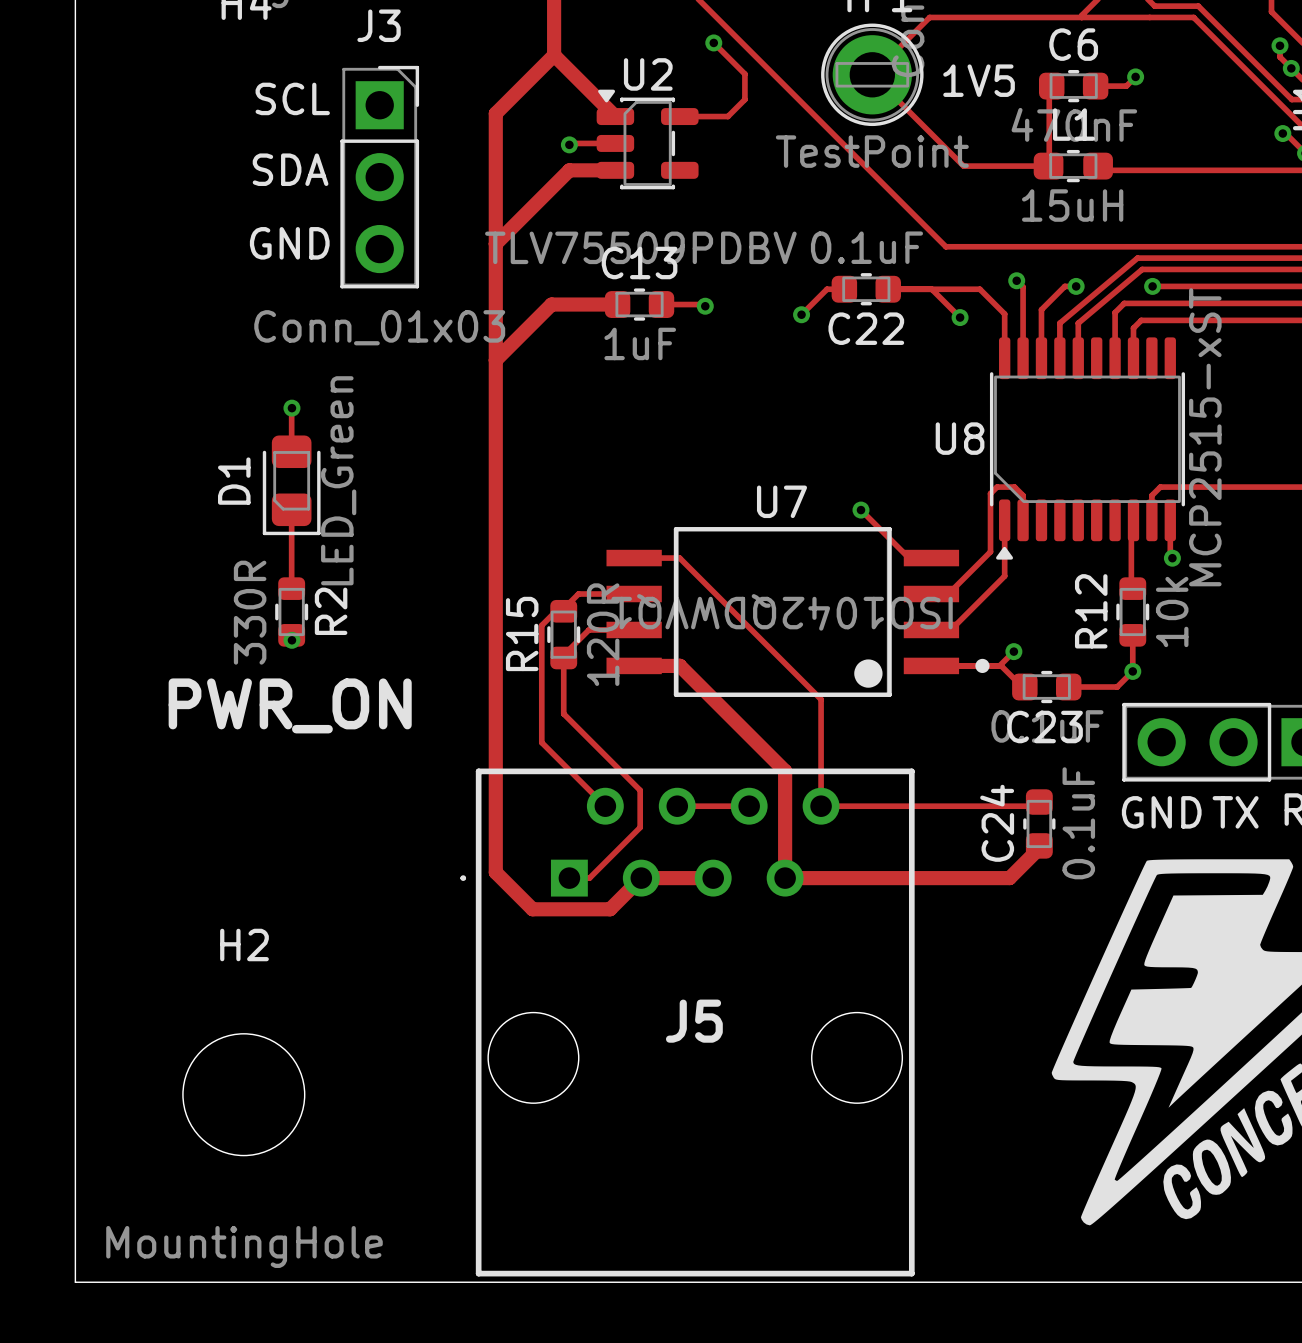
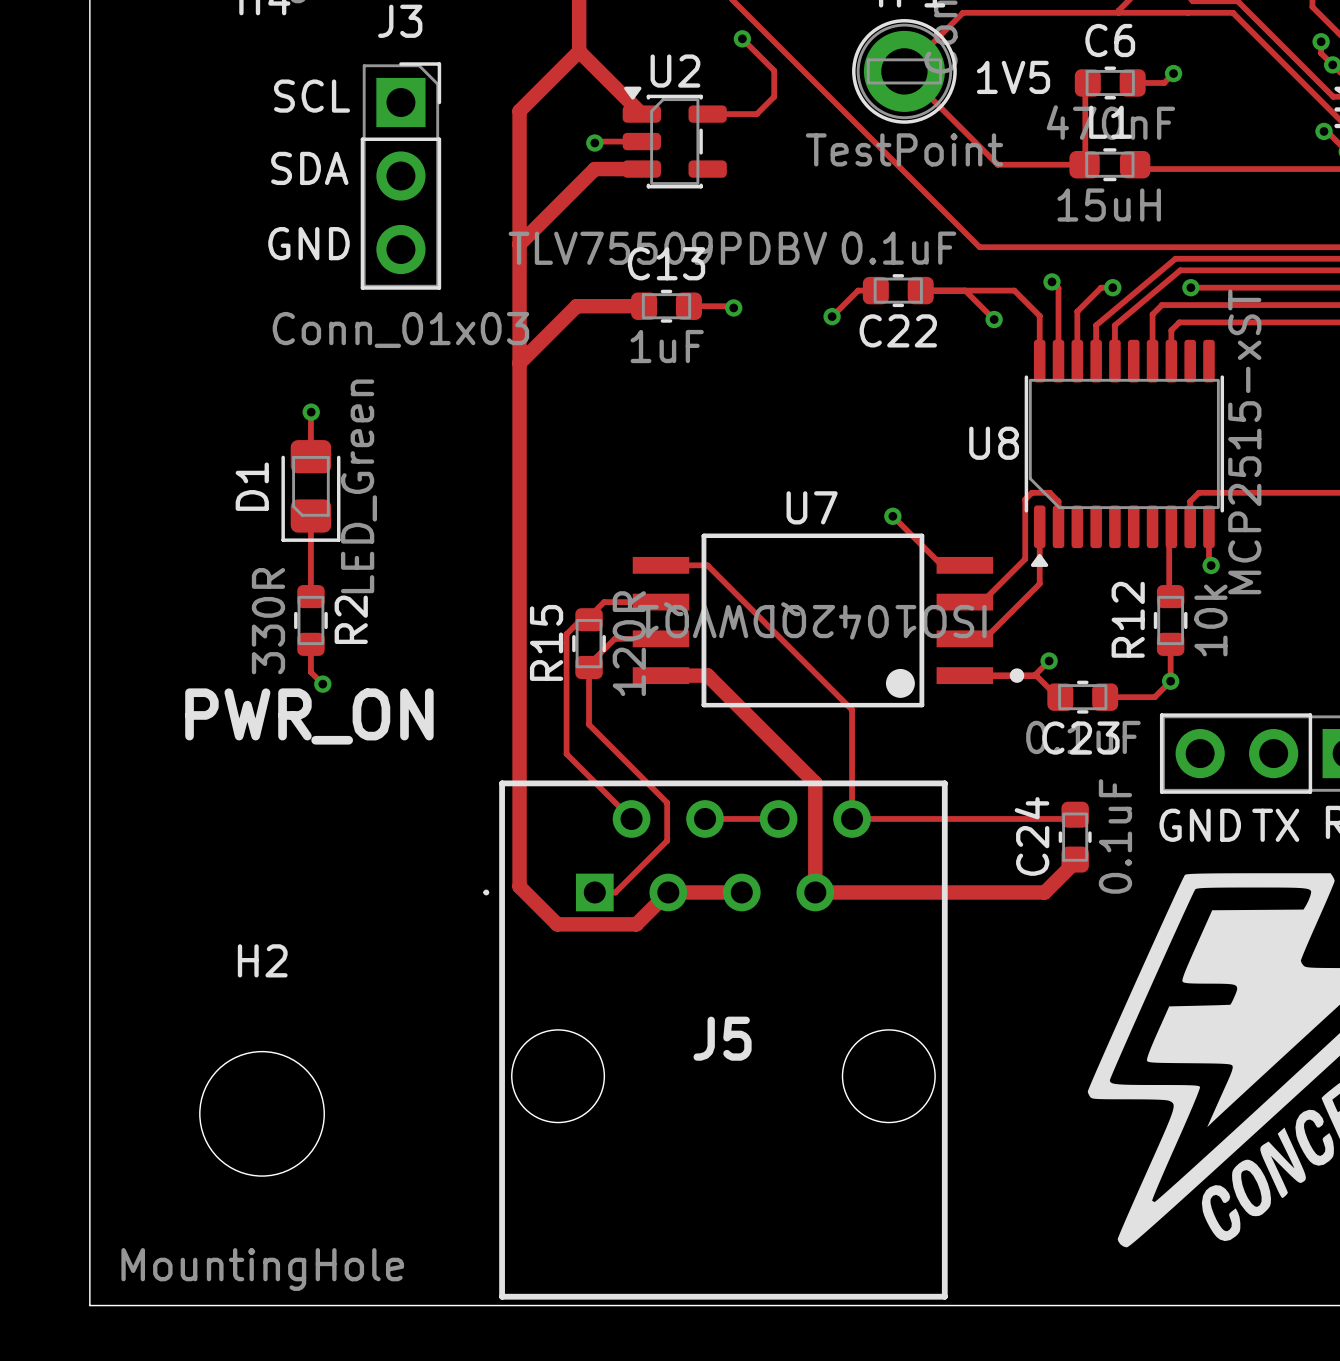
track: none -> (310, 646) (310, 672) (322, 684)
via position: (291, 640) -> (322, 684)

